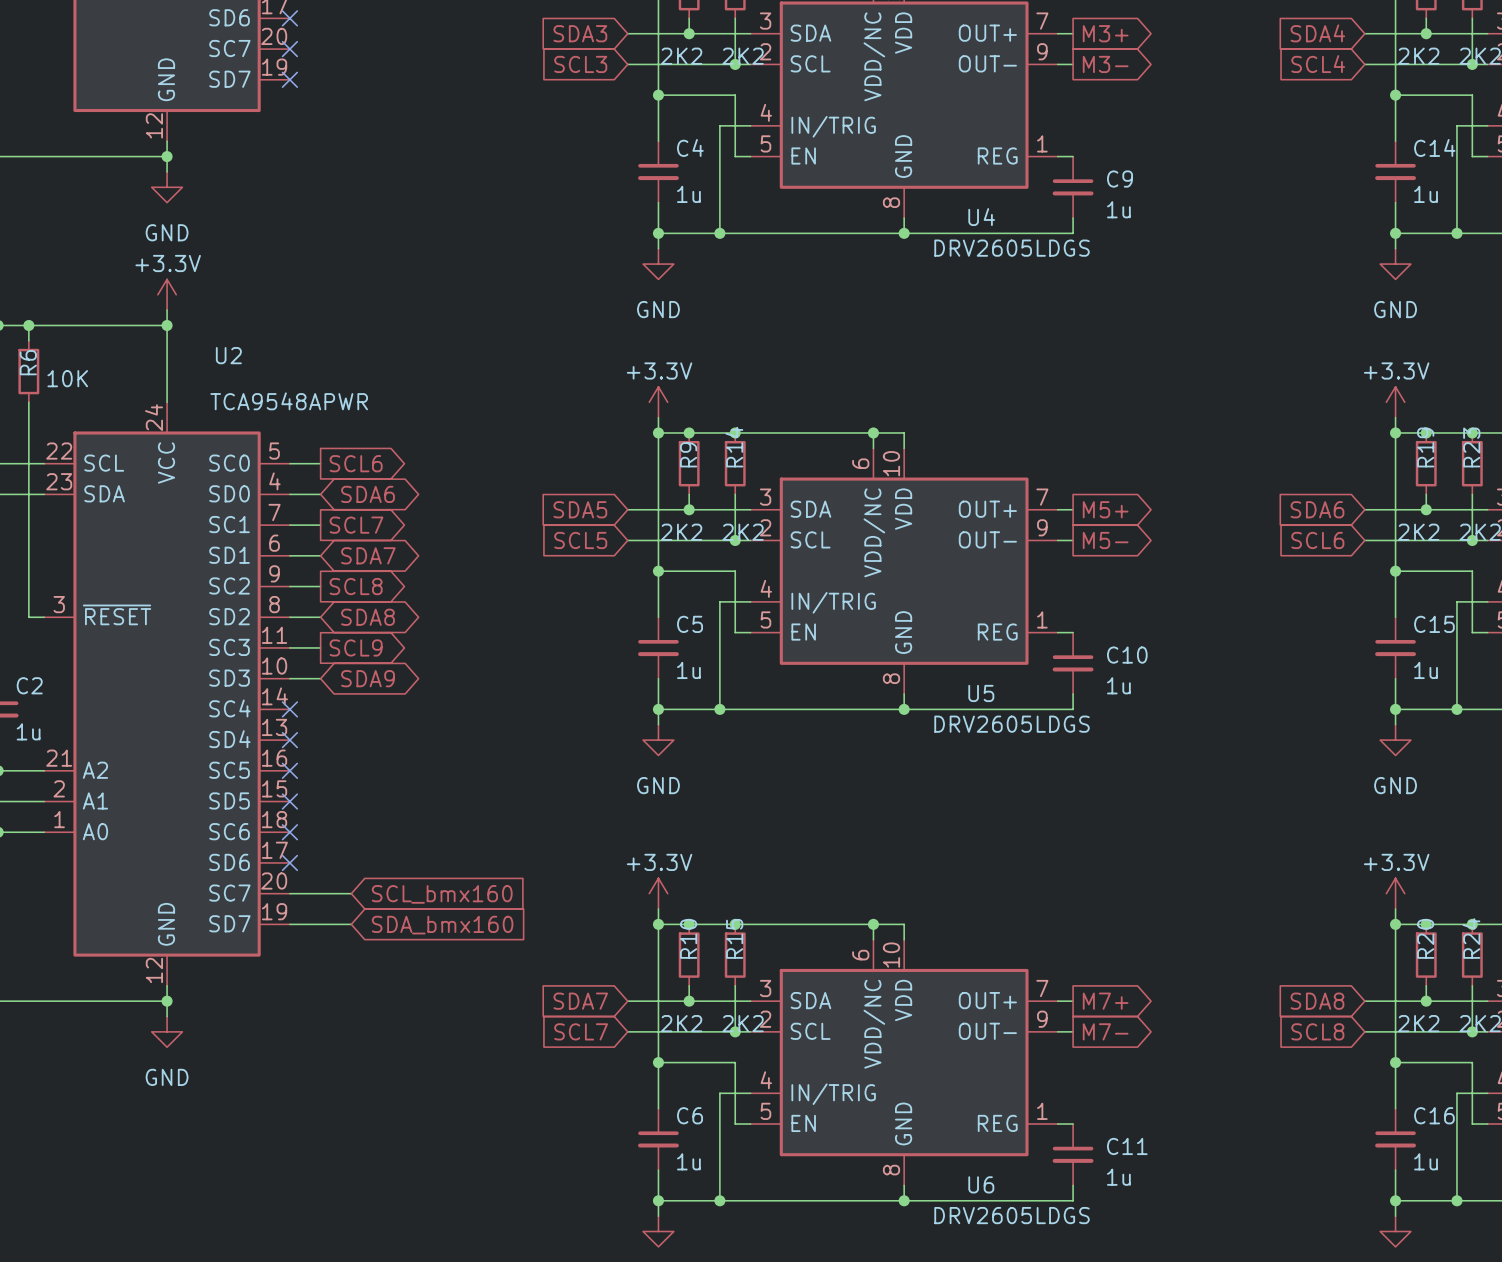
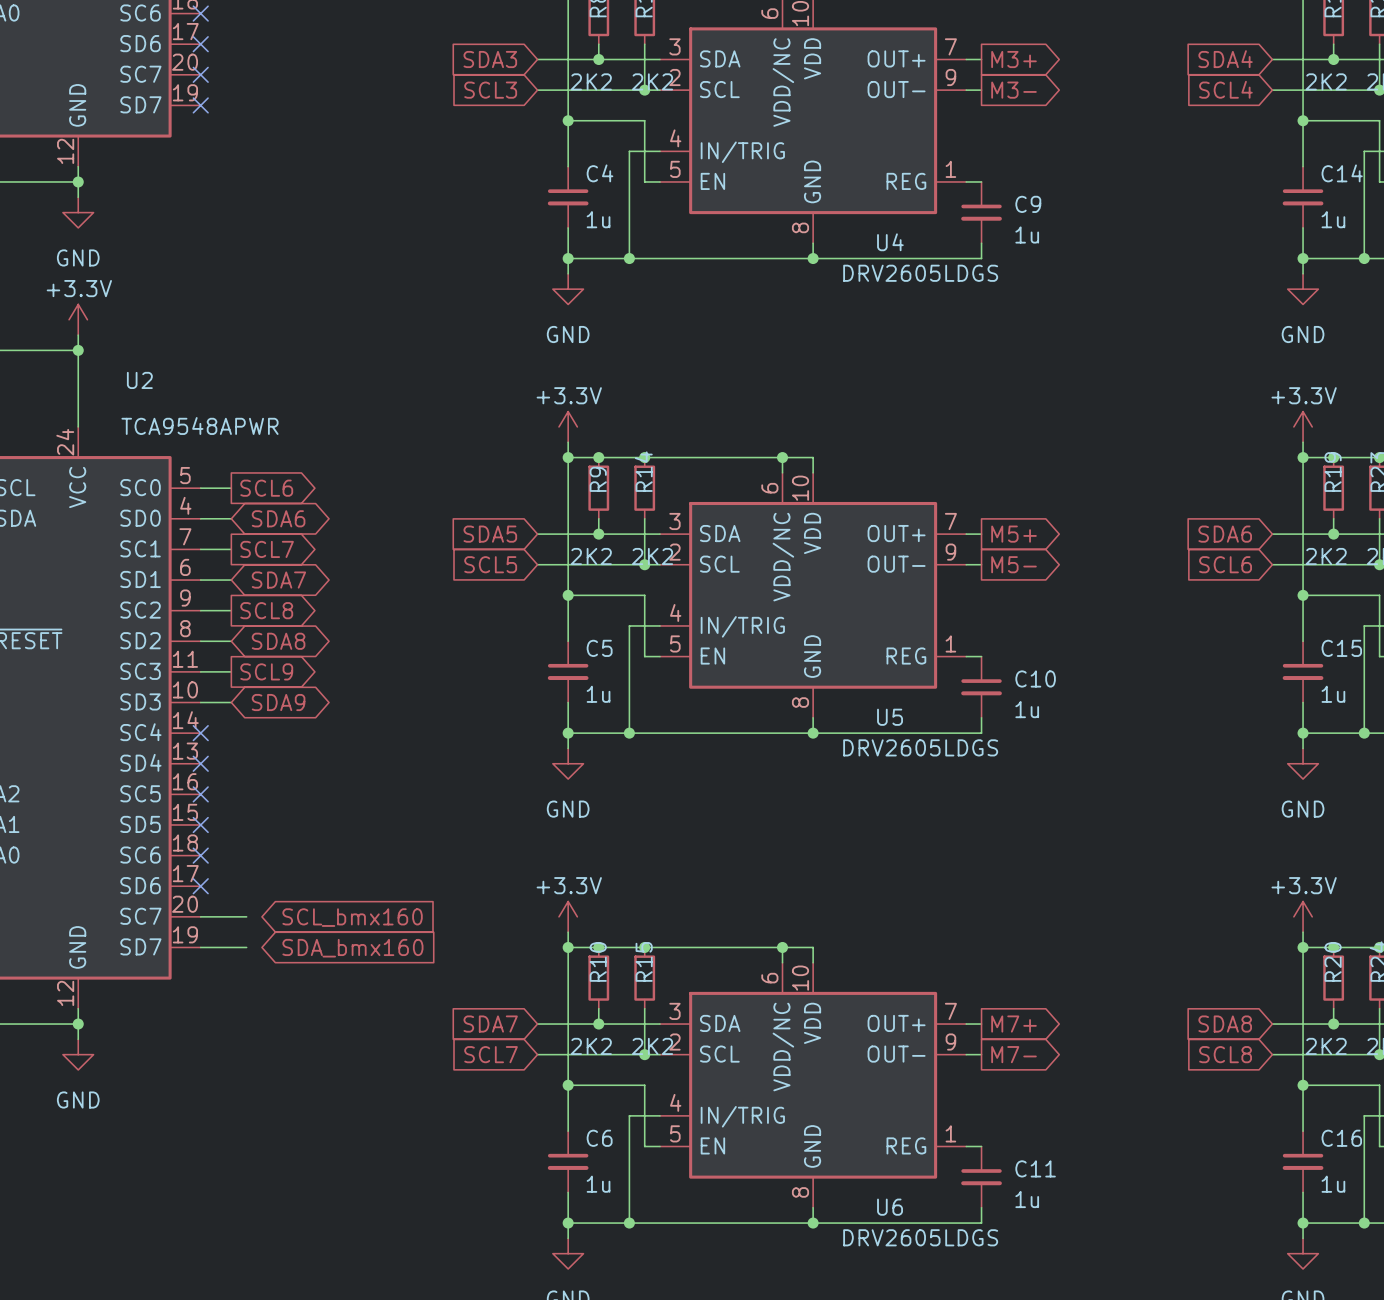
wire: (335, 893) (351, 893) -> none
wire: (335, 924) (351, 924) -> none

